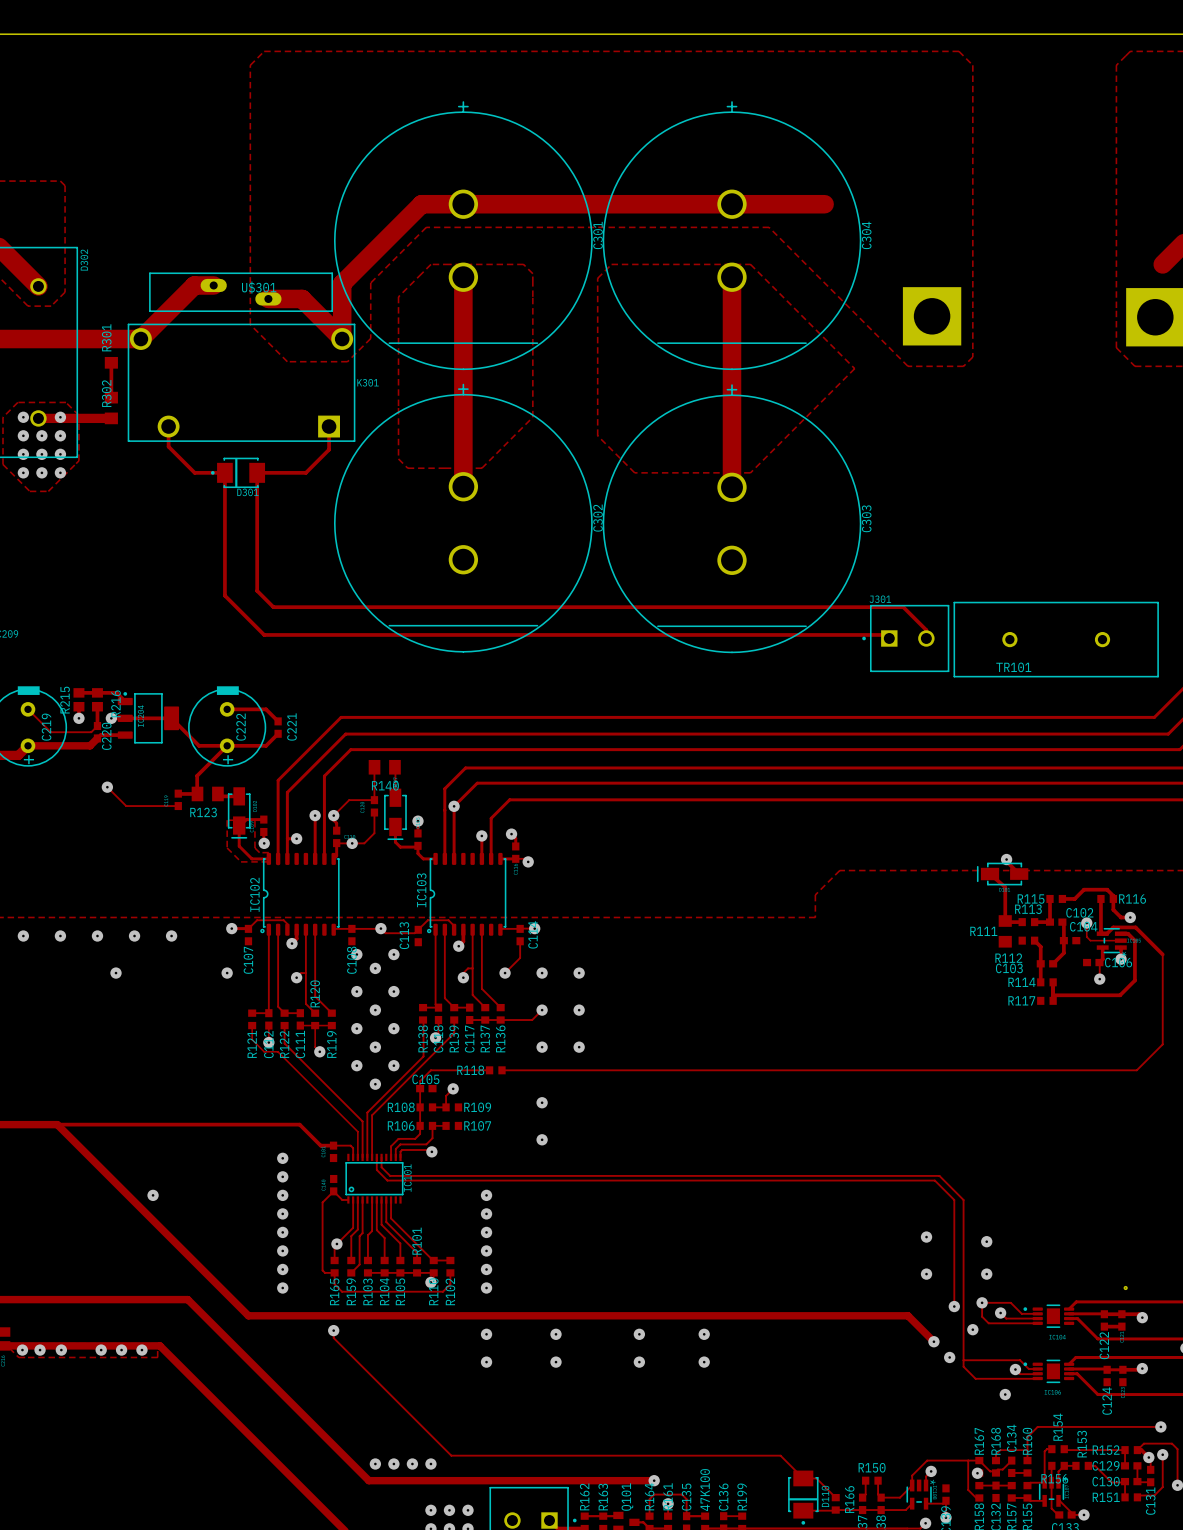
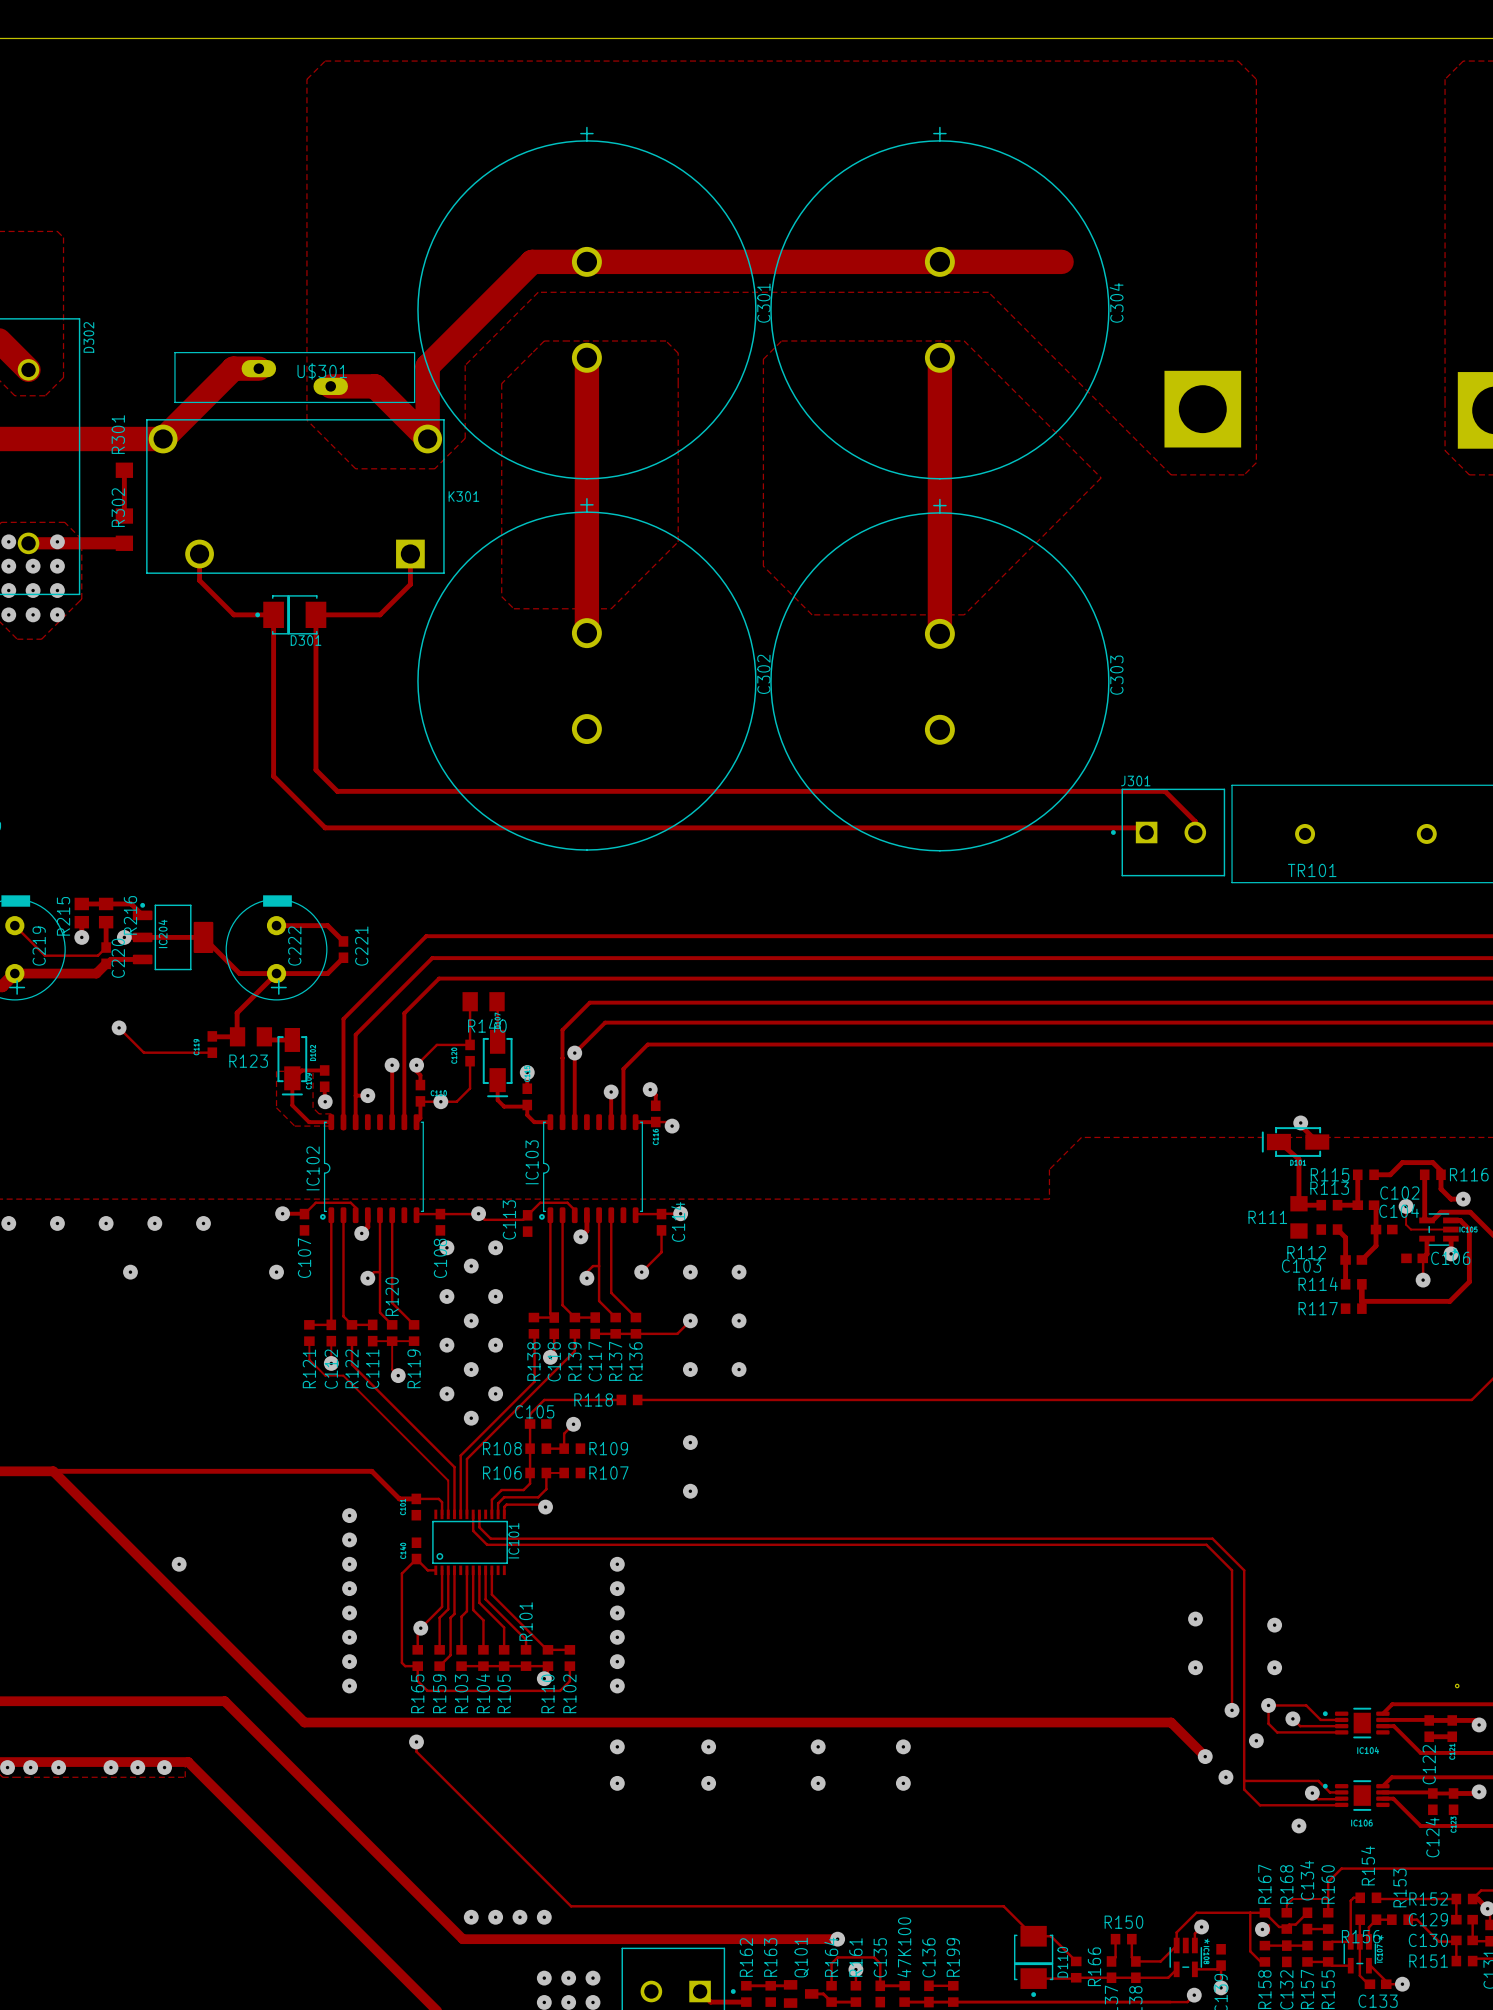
C301 footprint: [334, 101, 593, 370] -> [417, 126, 757, 480]
C304 footprint: [602, 101, 862, 370] -> [770, 126, 1110, 480]
C302 footprint: [334, 383, 593, 653] -> [417, 498, 757, 851]
C303 footprint: [602, 384, 862, 653] -> [770, 498, 1110, 852]

